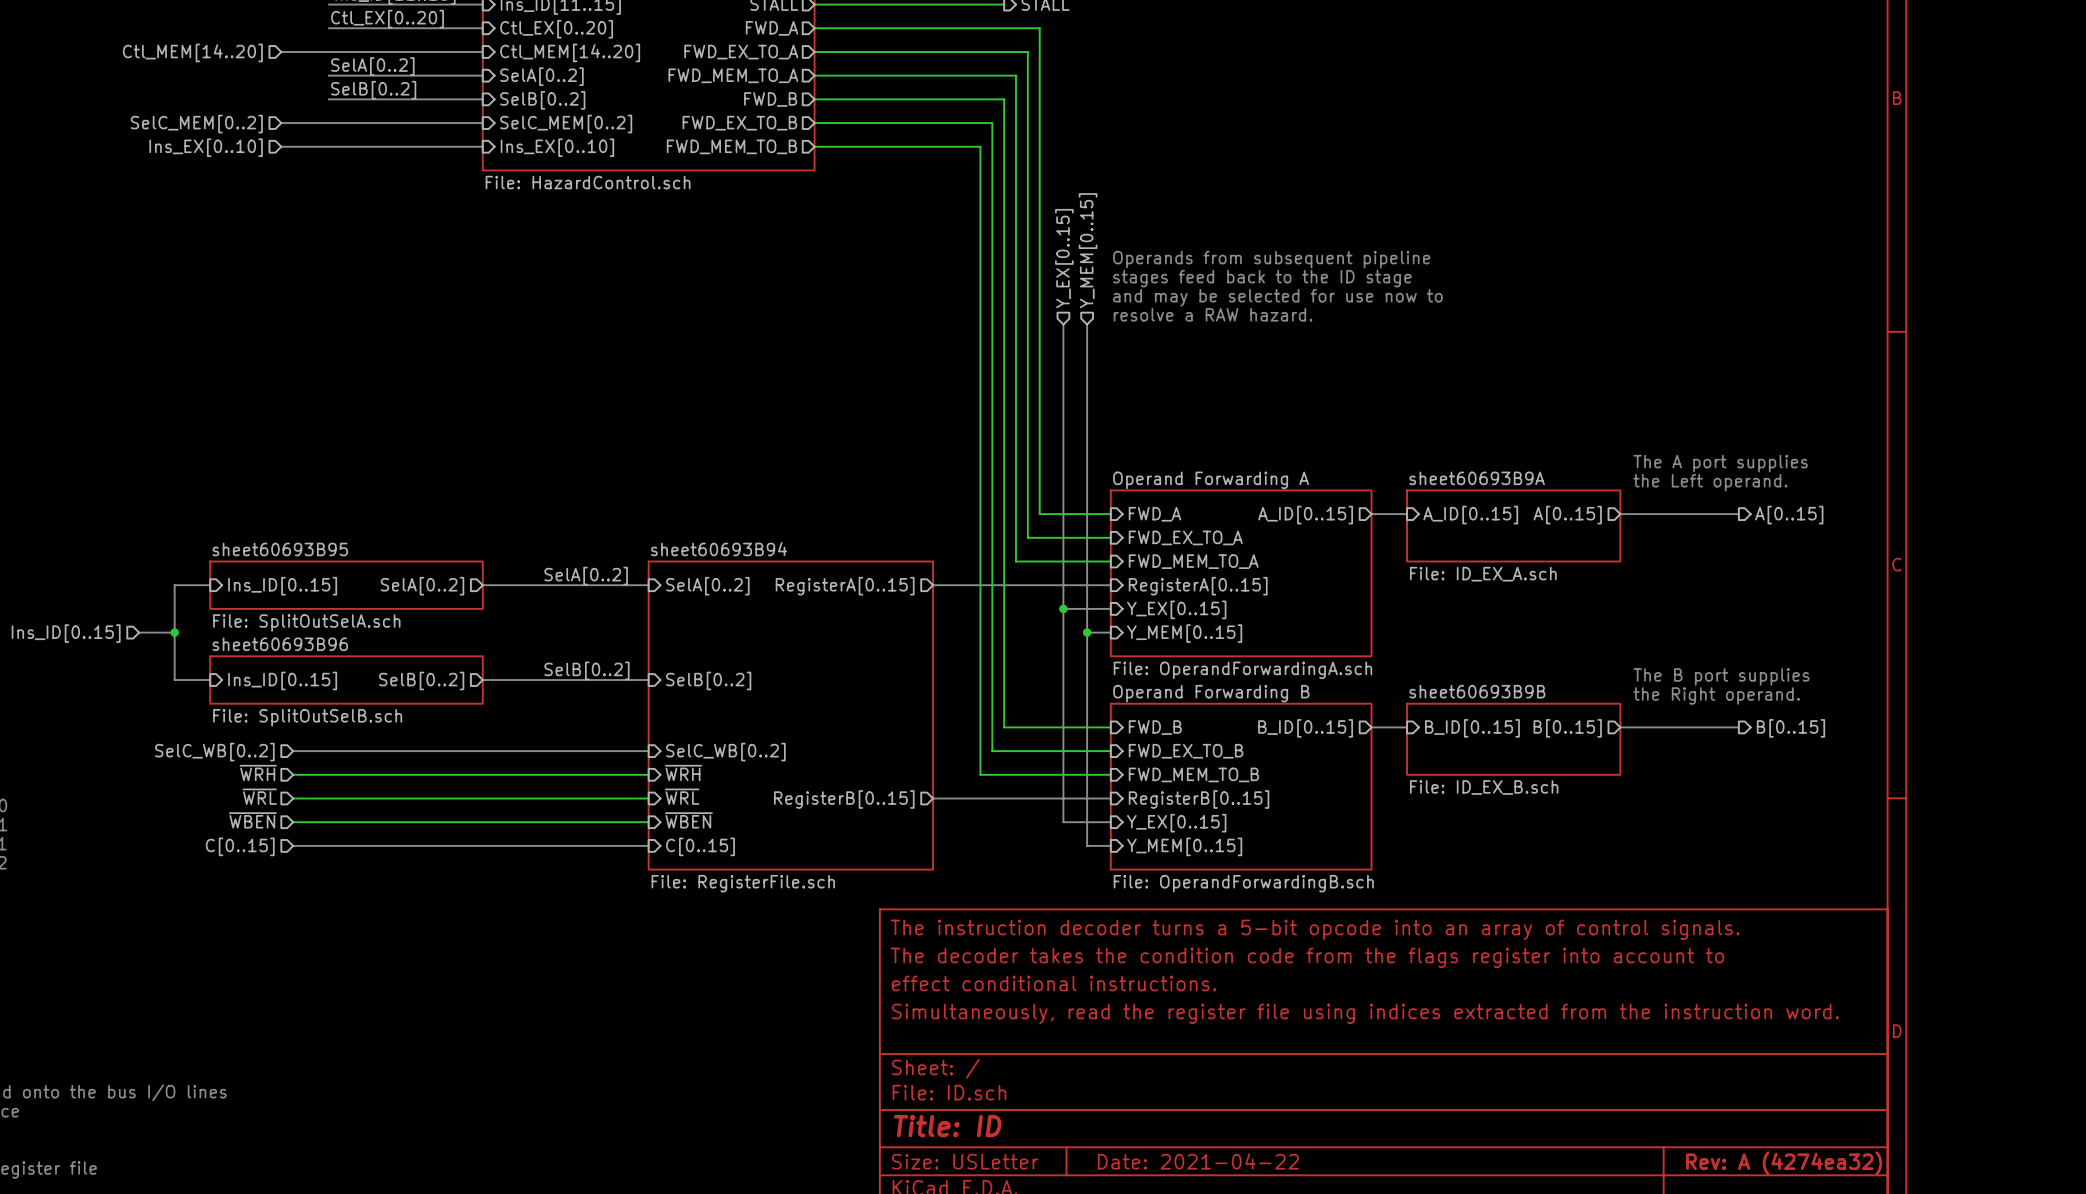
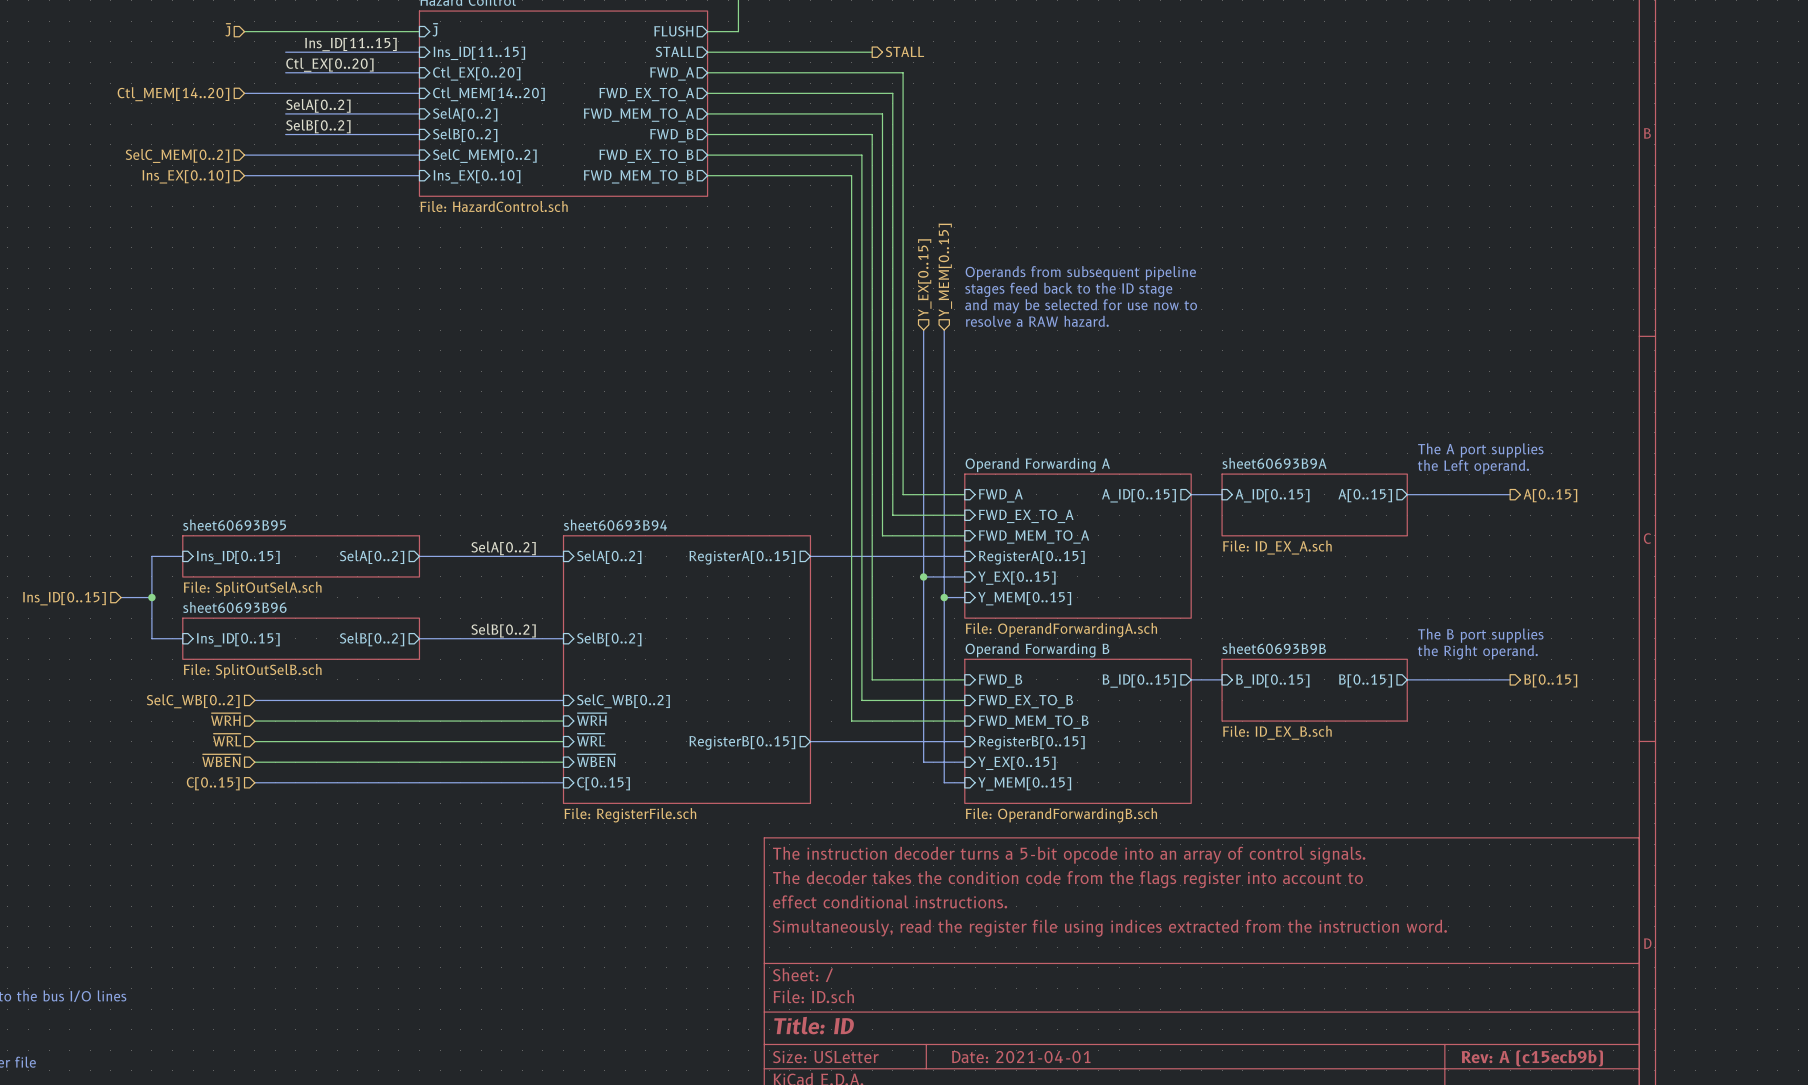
title block: Date: 2021-04-22 (1198, 1161) -> Date: 2021-04-01 (1021, 1057)
title block: Rev: A (4274ea32) (1784, 1163) -> Rev: A (c15ecb9b) (1532, 1058)

